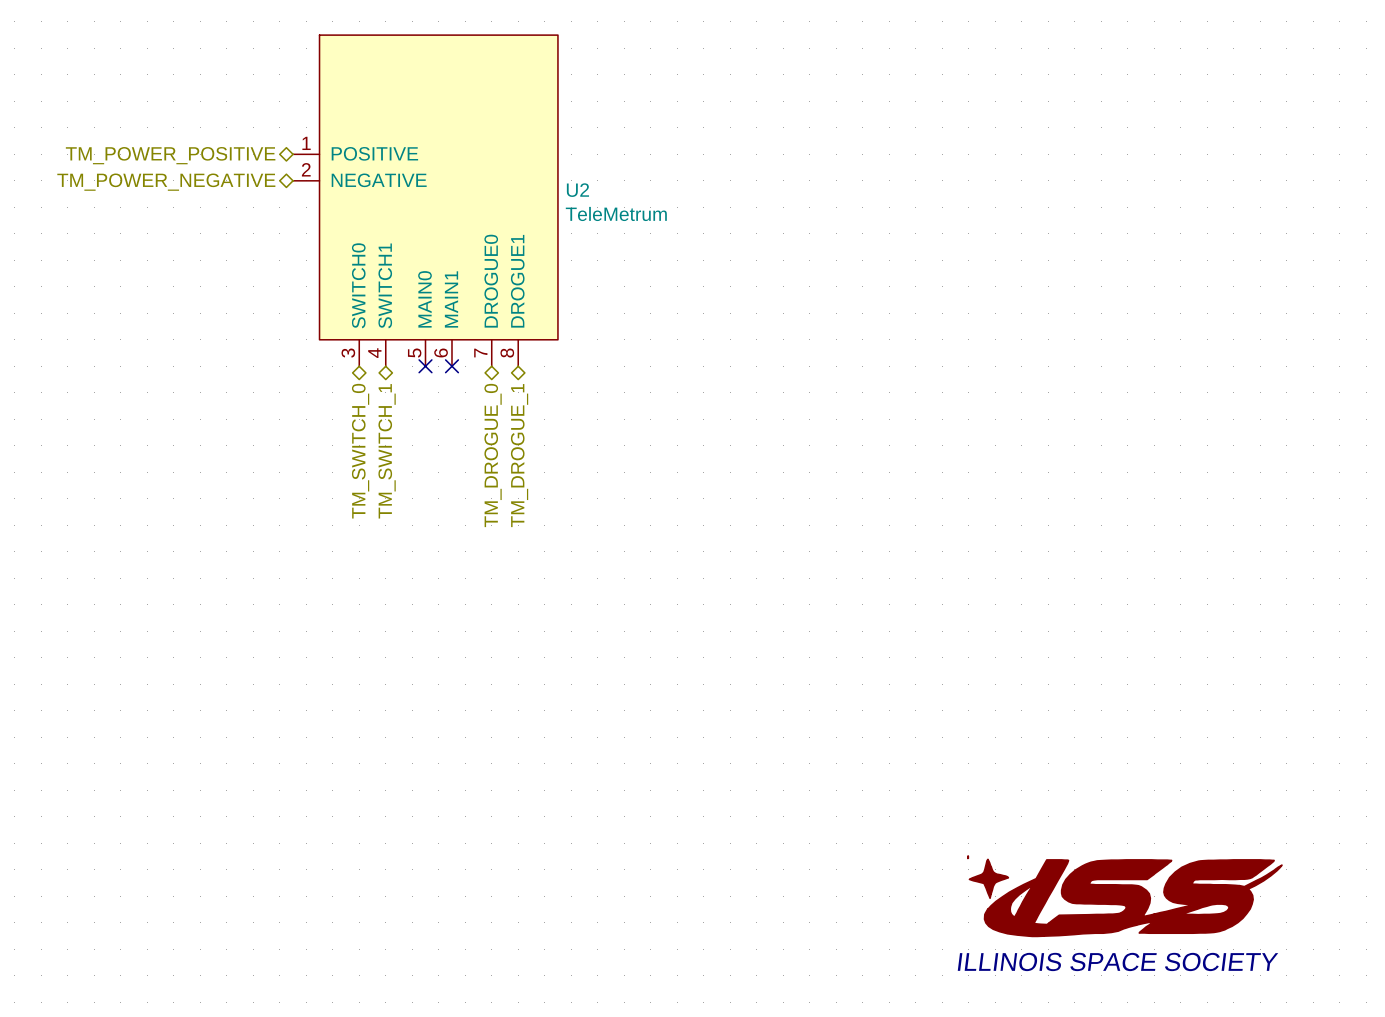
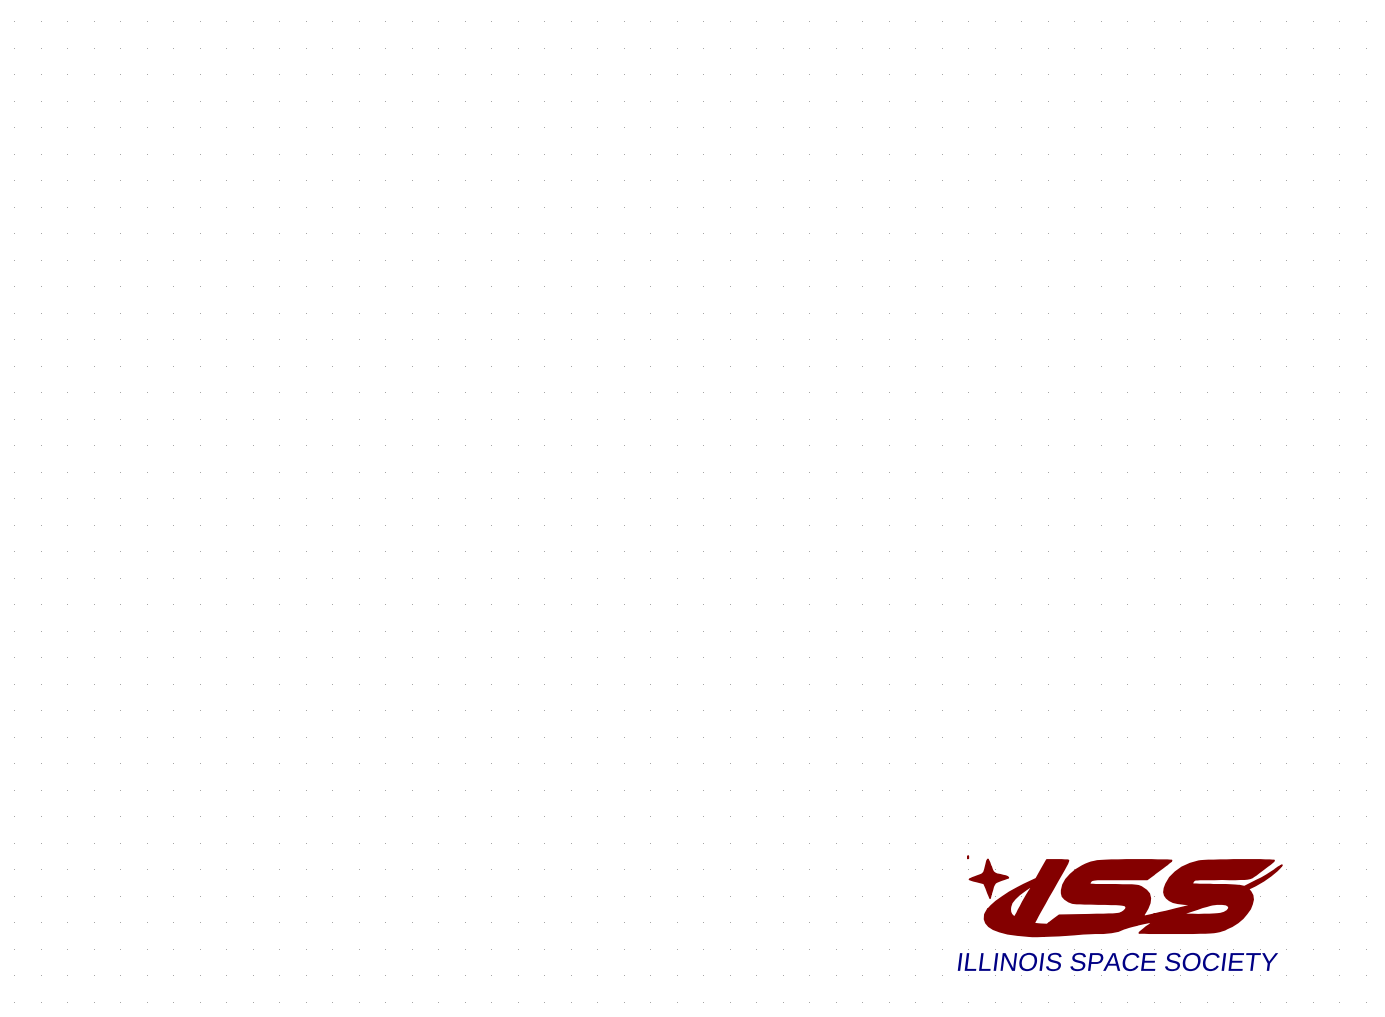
hierarchical label: TM_POWER_POSITIVE (170, 155) -> none
hierarchical label: TM_POWER_NEGATIVE (166, 182) -> none
U2: TeleMetrum (425, 200) -> none
no-connect mark: (425, 366) -> none
no-connect mark: (451, 366) -> none
hierarchical label: TM_SWITCH_0 (360, 451) -> none
hierarchical label: TM_SWITCH_1 (387, 451) -> none
hierarchical label: TM_DROGUE_0 (493, 455) -> none
hierarchical label: TM_DROGUE_1 (519, 455) -> none

